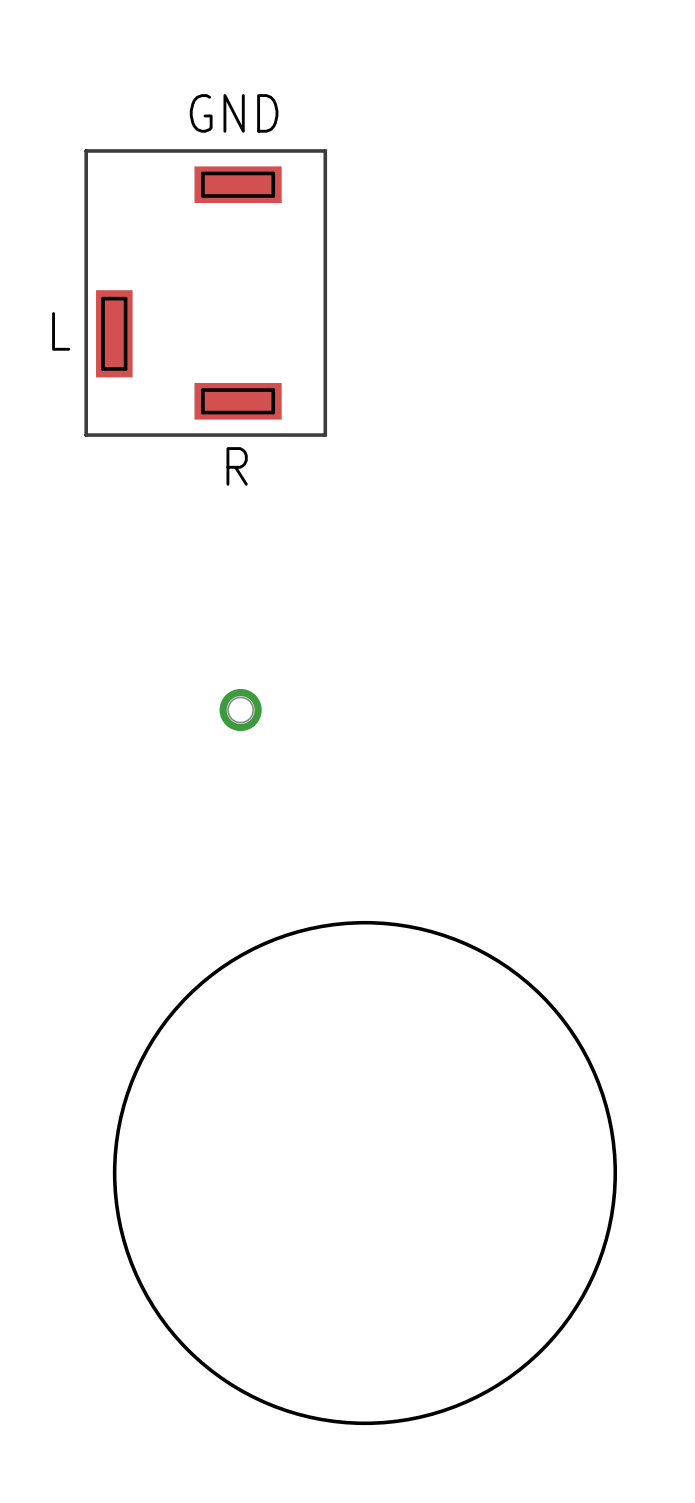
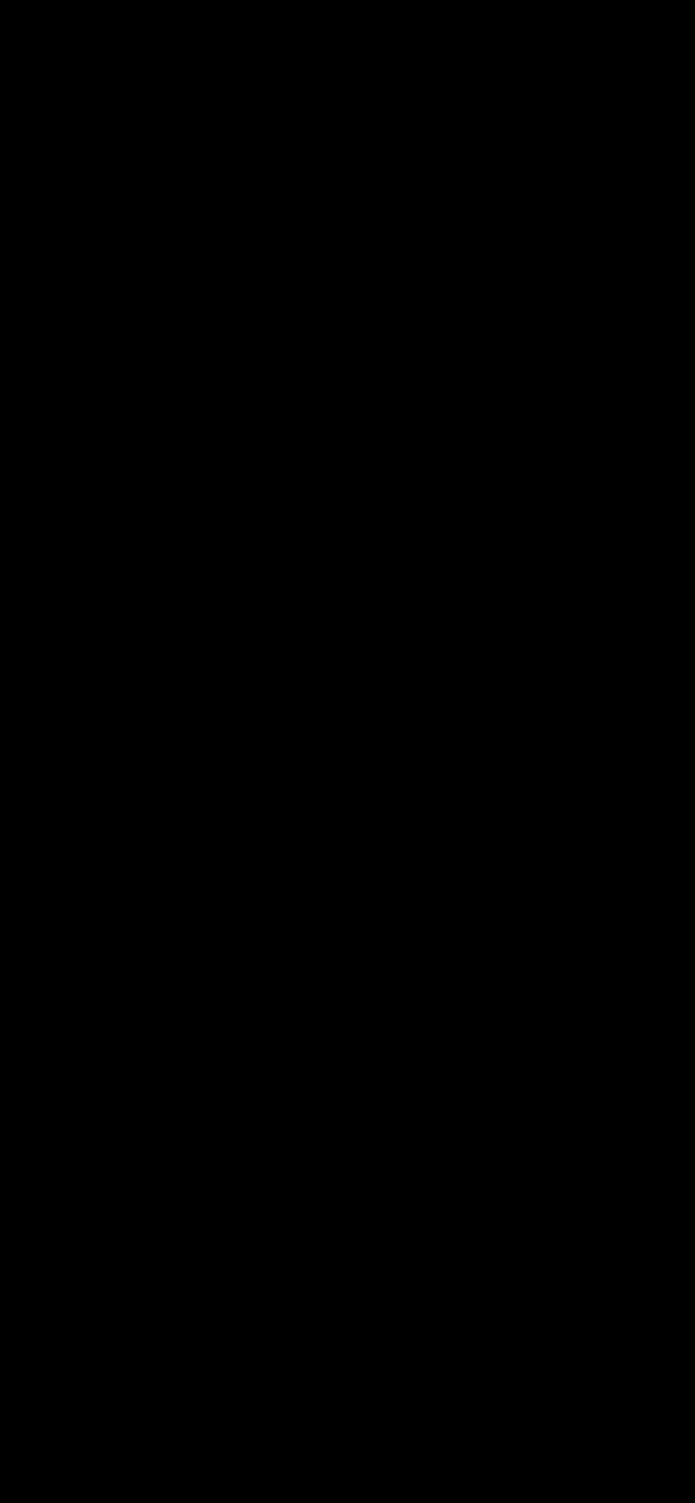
part: (205, 293) -> none
part: (240, 710) -> none
part: (364, 1173) -> none

